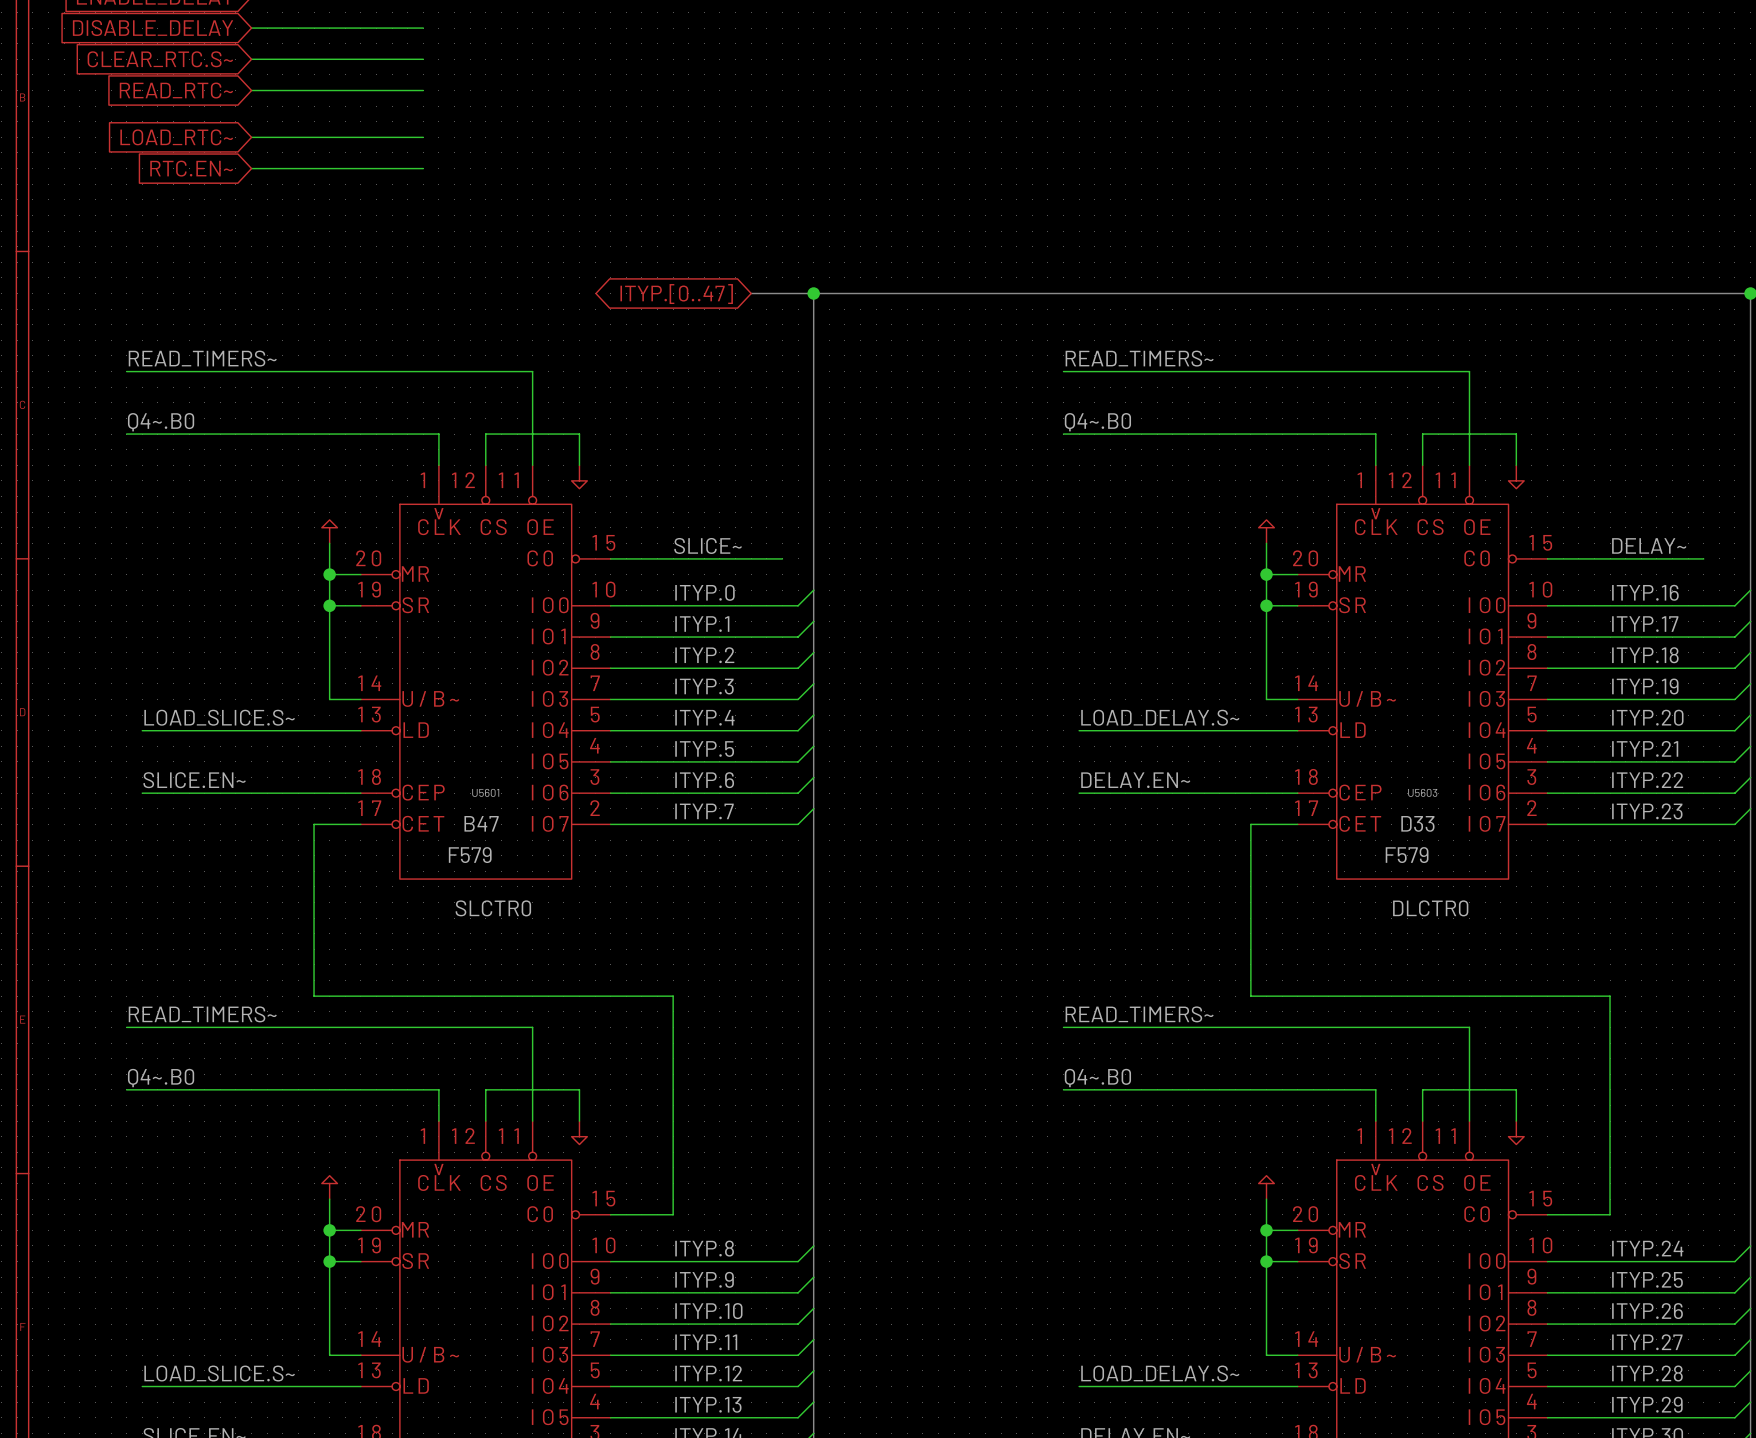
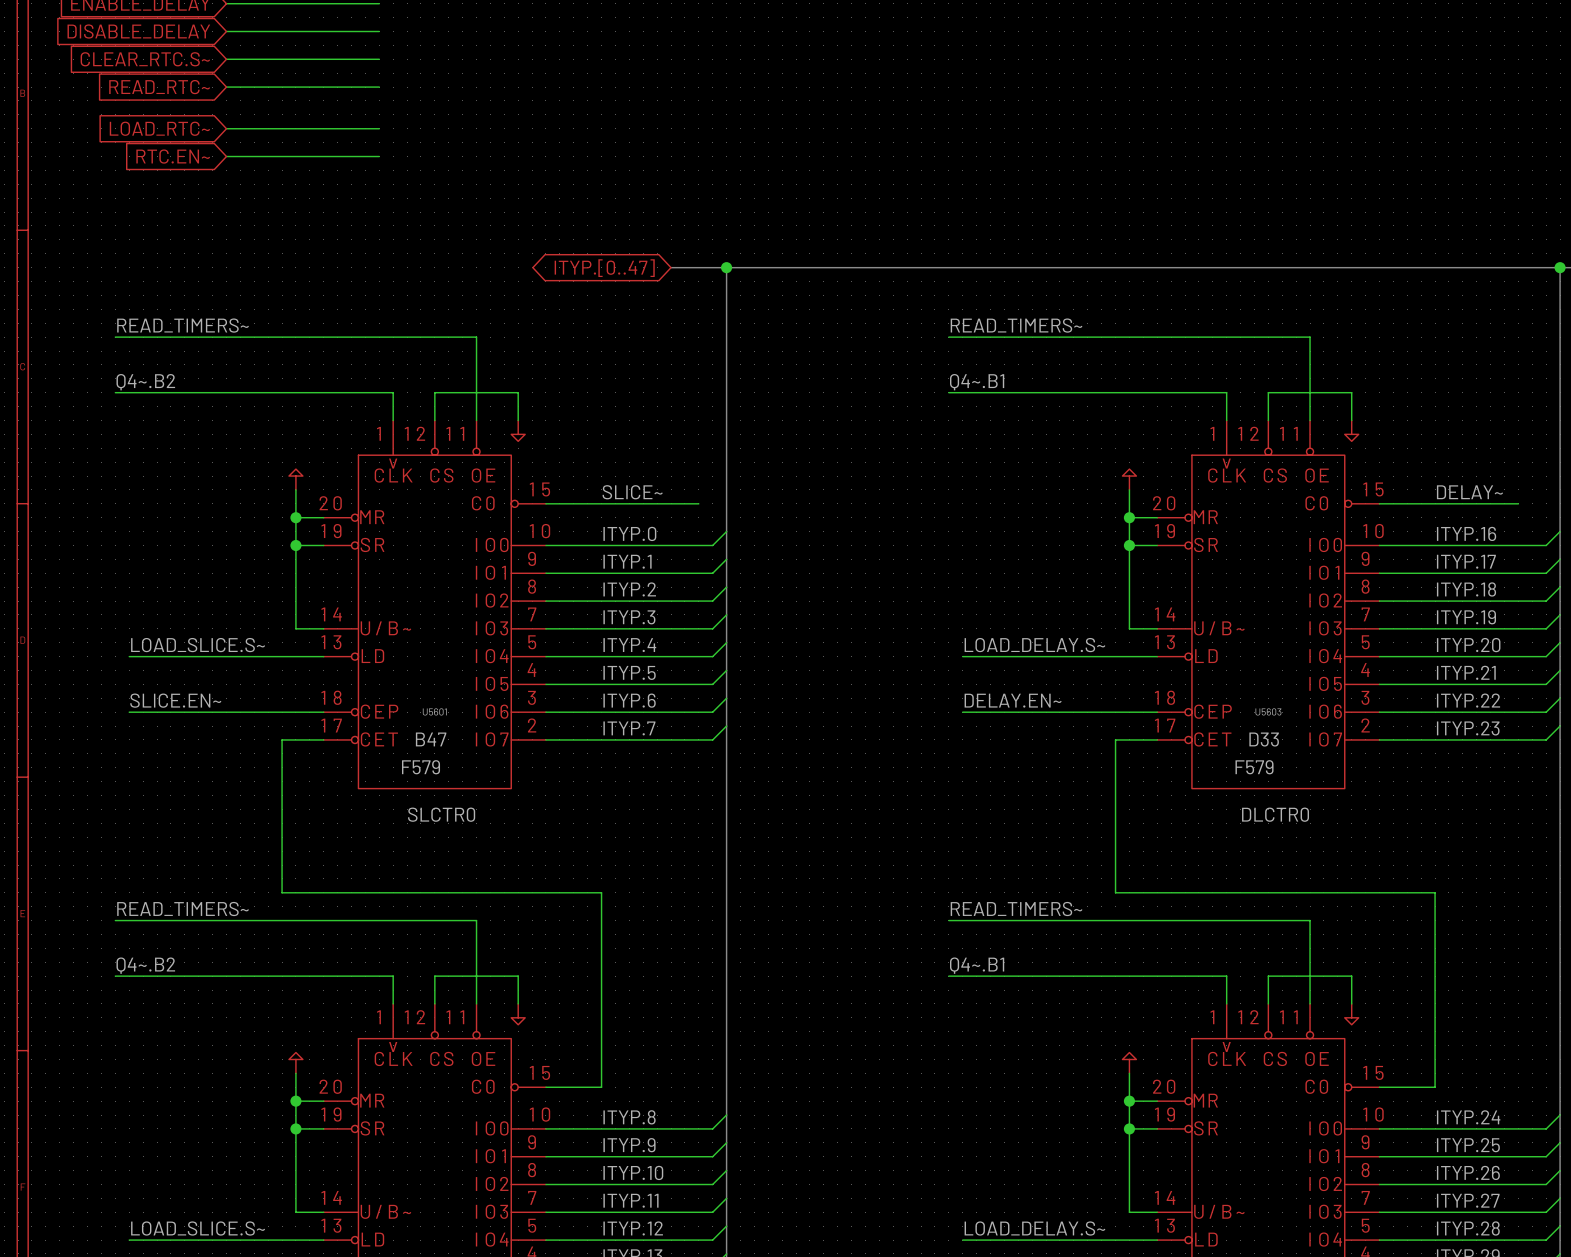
label: Q4~.B0 (161, 422) -> Q4~.B2 (145, 382)
label: Q4~.B0 (1097, 422) -> Q4~.B1 (977, 382)
label: Q4~.B0 (161, 1078) -> Q4~.B2 (145, 965)
label: Q4~.B0 (1097, 1078) -> Q4~.B1 (977, 965)

